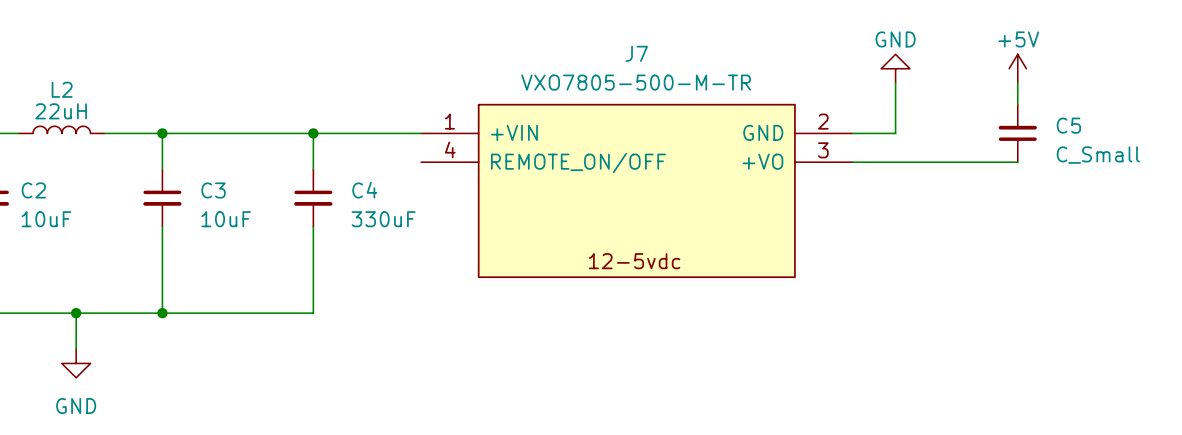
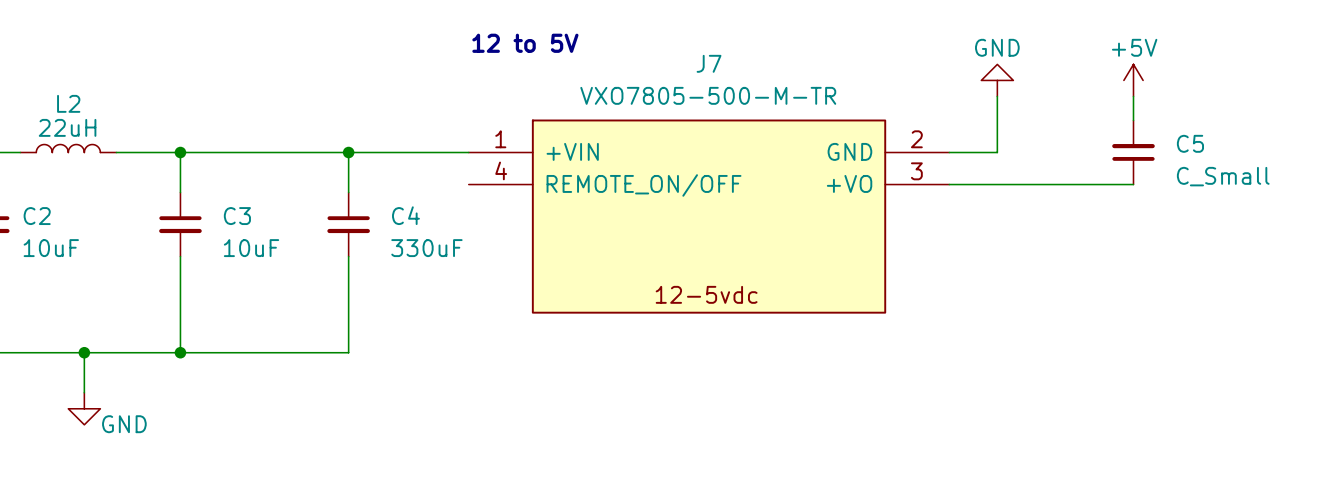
text: none -> 12 to 5V (525, 43)
power symbol text position: GND (76, 406) -> GND (124, 424)

